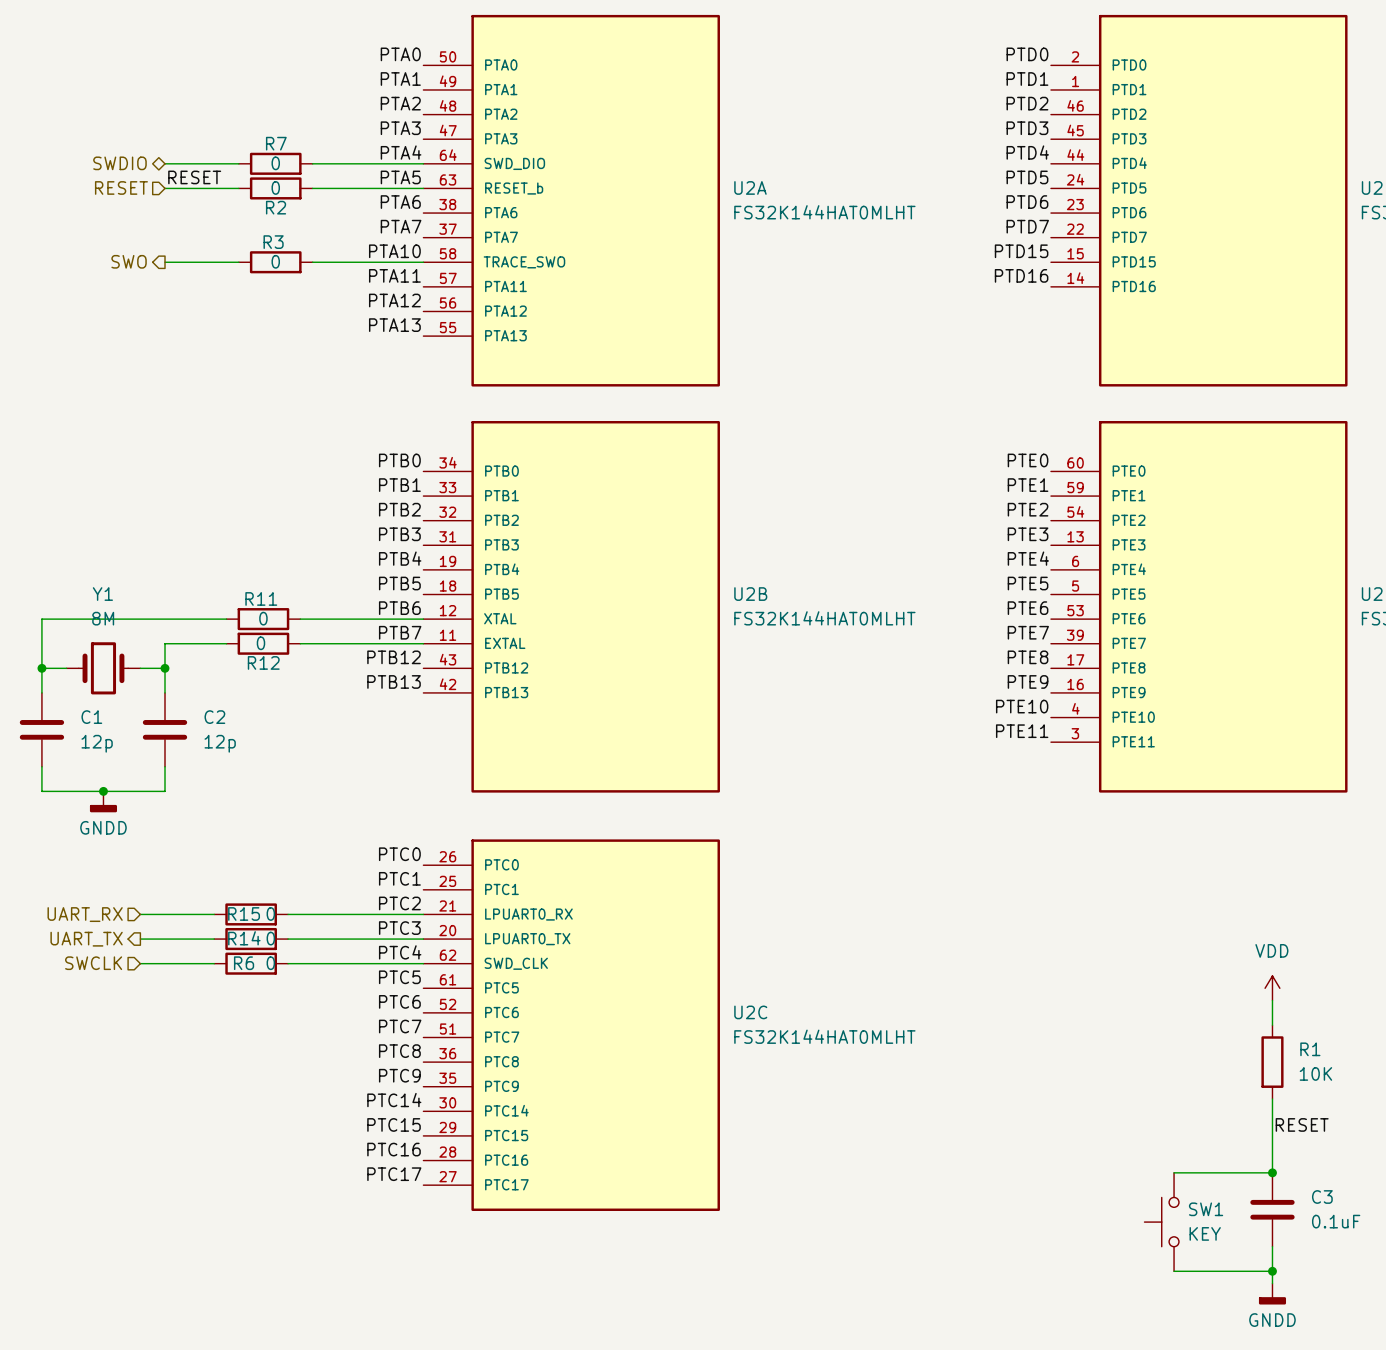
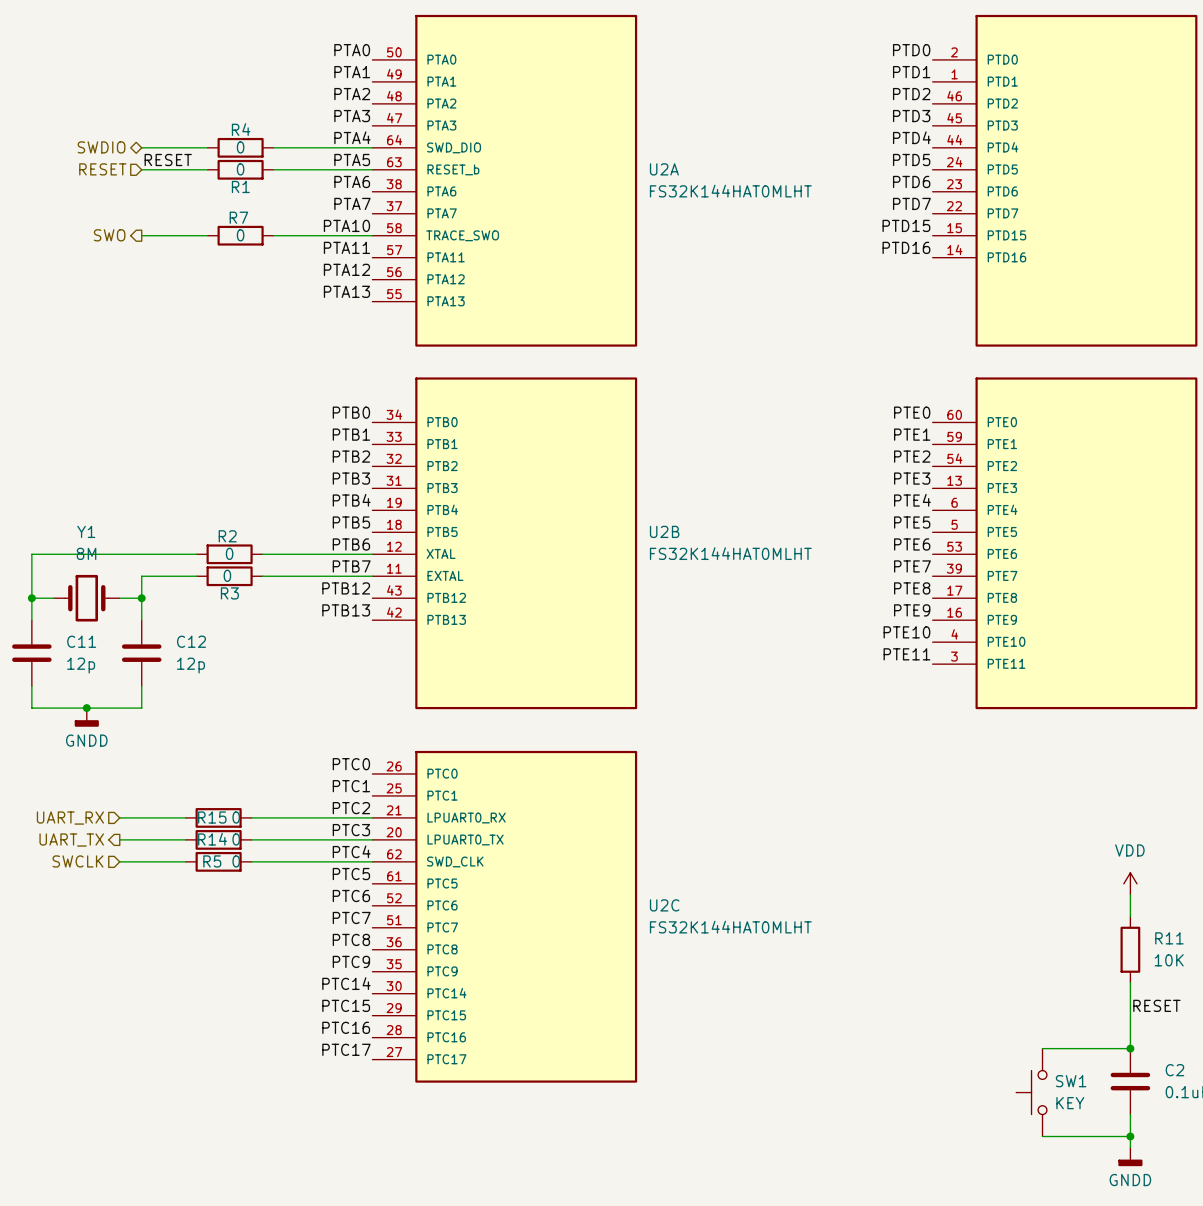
R7 name: R7 (276, 143) -> R4 (241, 129)
R2 name: R2 (276, 207) -> R1 (240, 186)
R3 name: R3 (273, 242) -> R7 (238, 217)
R11 name: R11 (261, 598) -> R2 (227, 536)
R12 name: R12 (263, 662) -> R3 (229, 593)
C1 name: C1 (91, 717) -> C11 (81, 641)
C2 name: C2 (214, 717) -> C12 (191, 641)
R6 name: R6 (244, 963) -> R5 (212, 861)
R1 name: R1 (1310, 1049) -> R11 (1169, 938)
C3 name: C3 (1322, 1197) -> C2 (1174, 1070)

